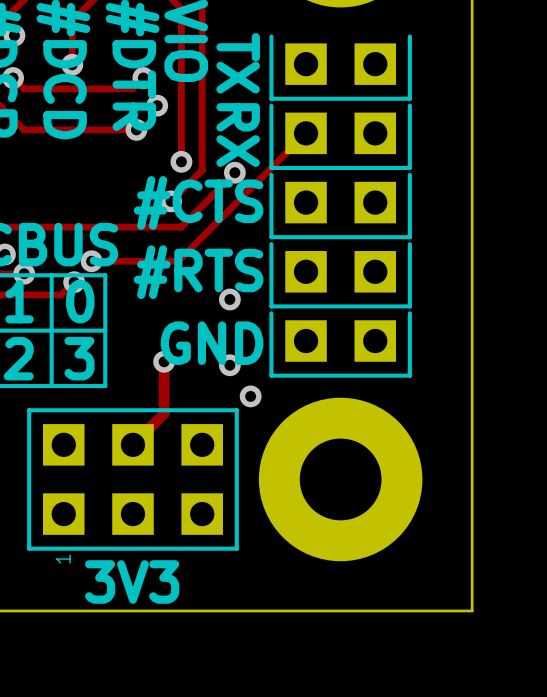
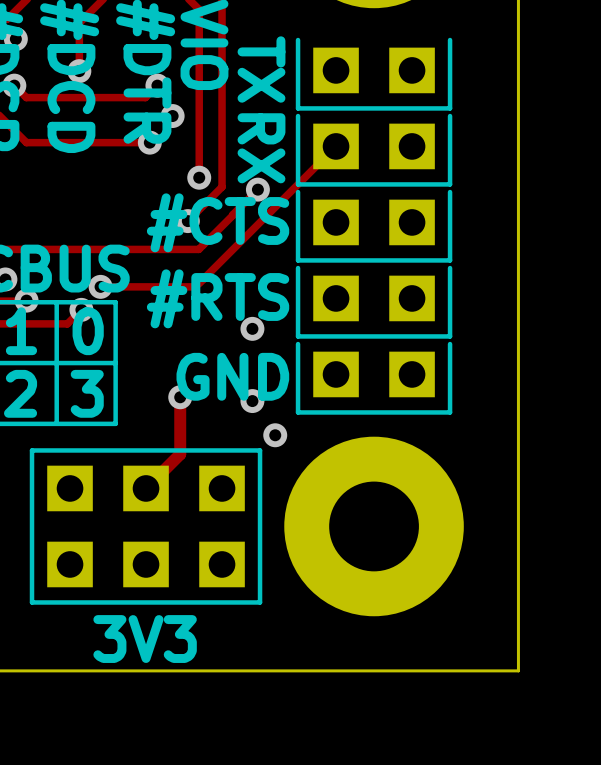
part text: 1 (63, 559) -> none

